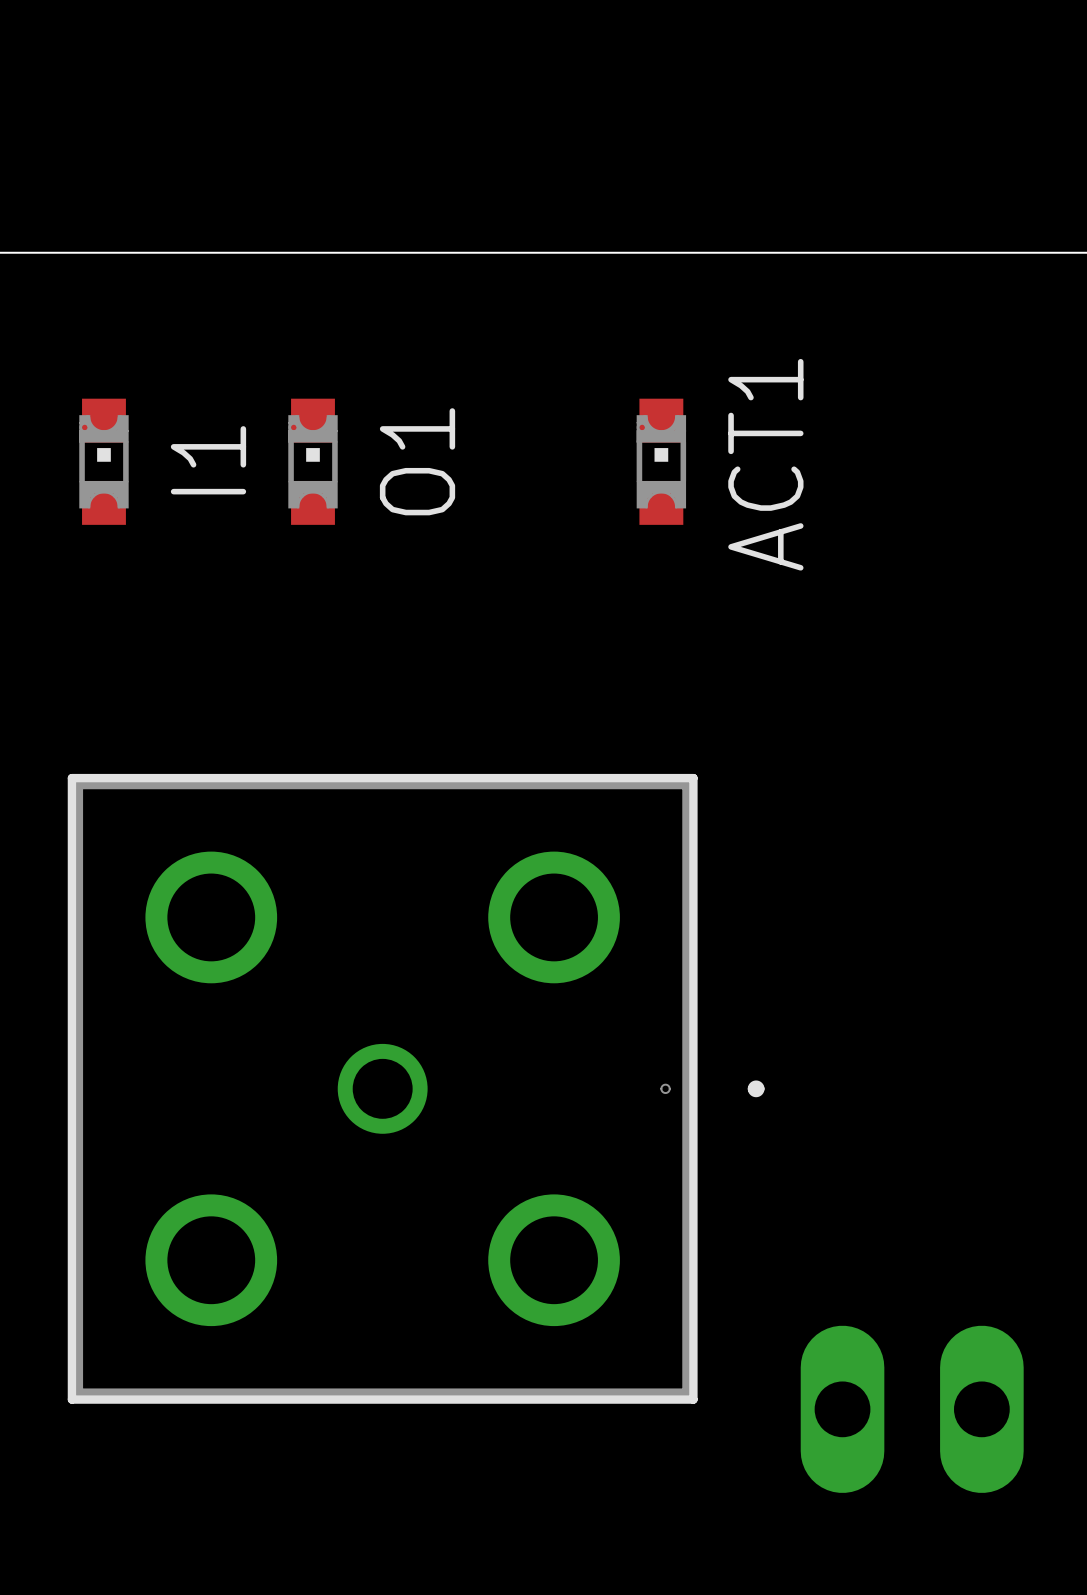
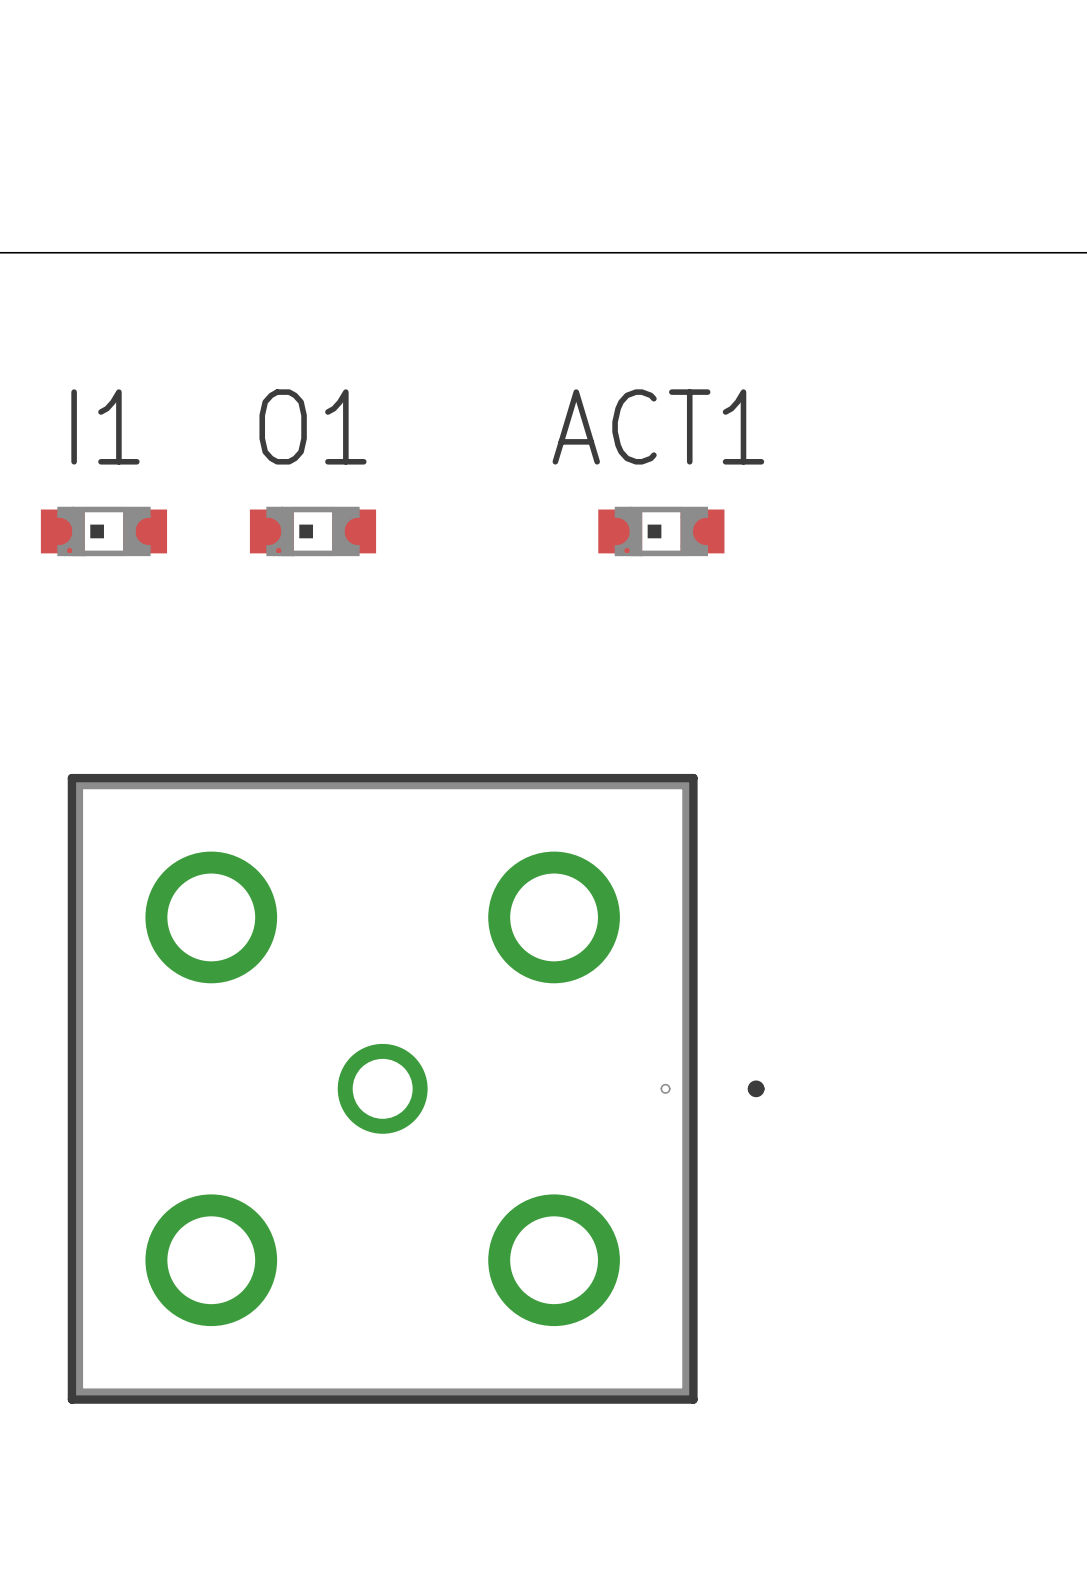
I1 rotation: 0° (103, 461) -> 90° counterclockwise (103, 531)
O1 rotation: 0° (313, 461) -> 90° counterclockwise (313, 531)
ACT1 rotation: 0° (661, 461) -> 90° counterclockwise (661, 531)
part: (912, 1409) -> none

